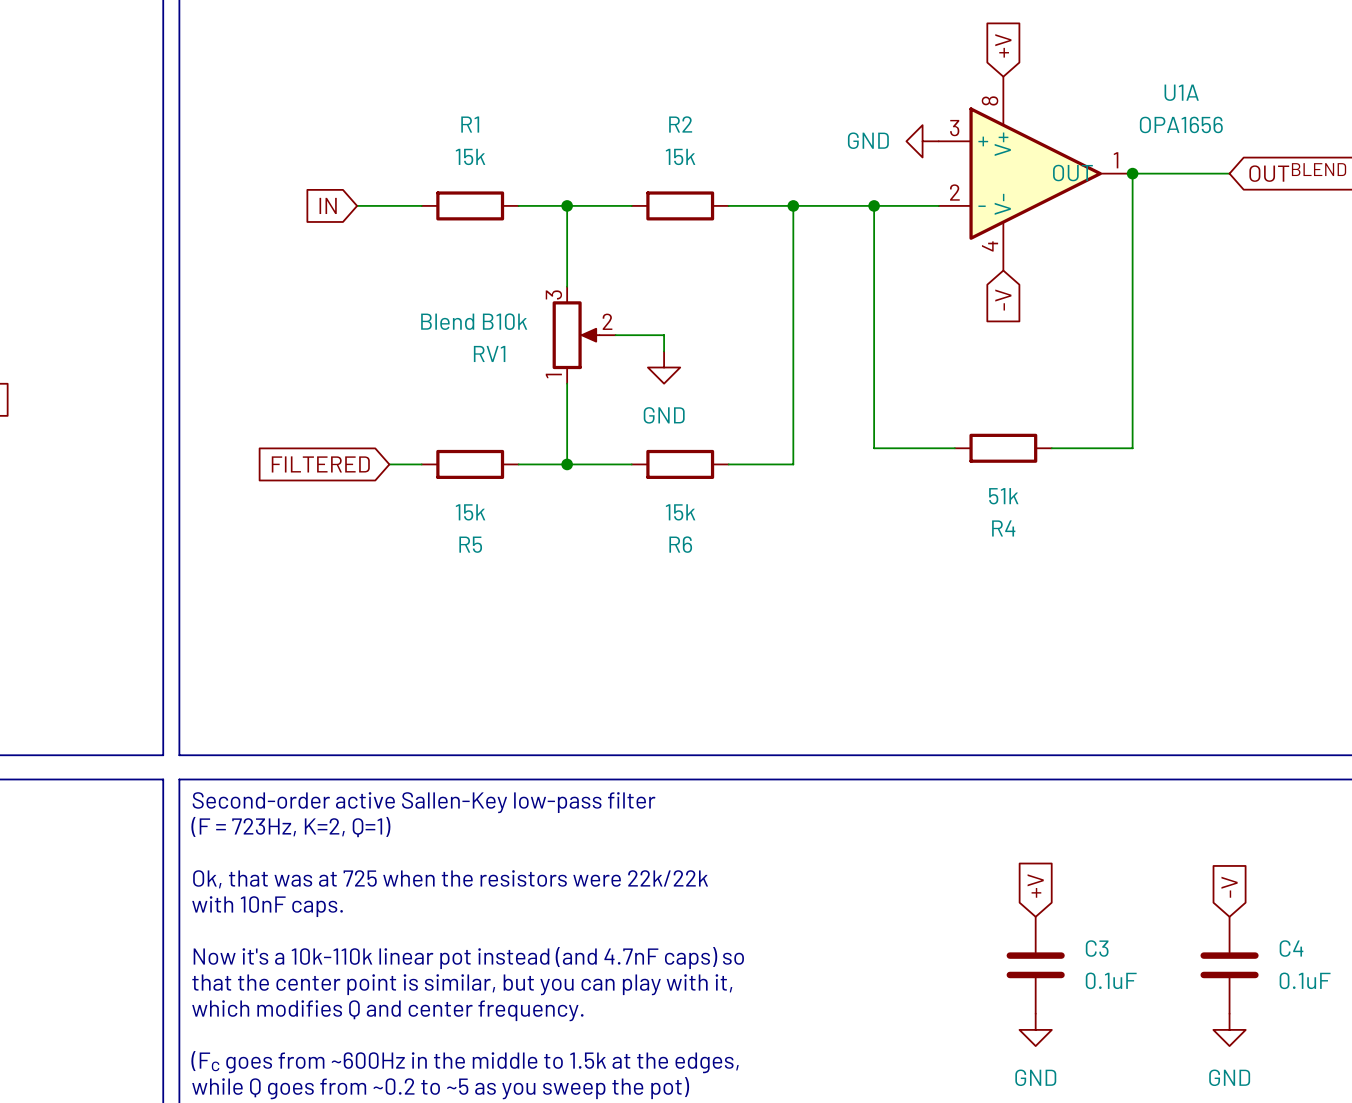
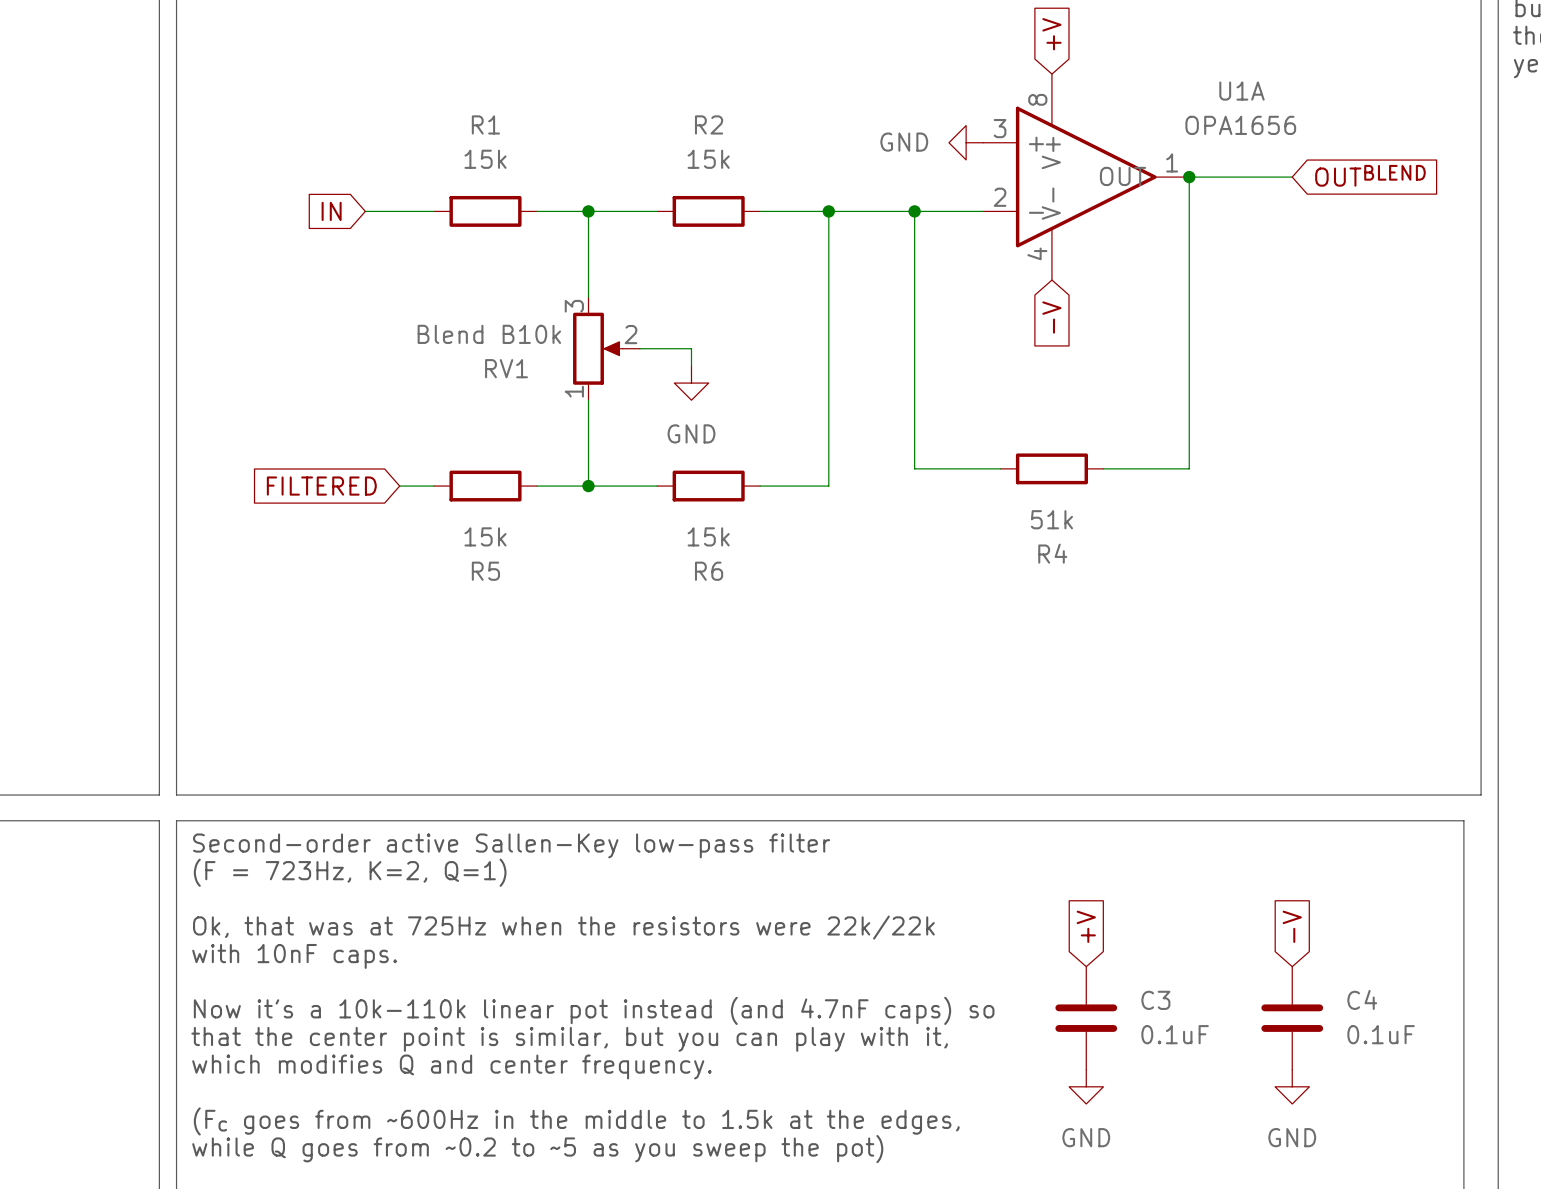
text: Ok, that was at 725 when the resistors were 22k/22k (450, 879) -> Ok, that was at 725Hz when the resistors were 22k/22k (563, 927)

